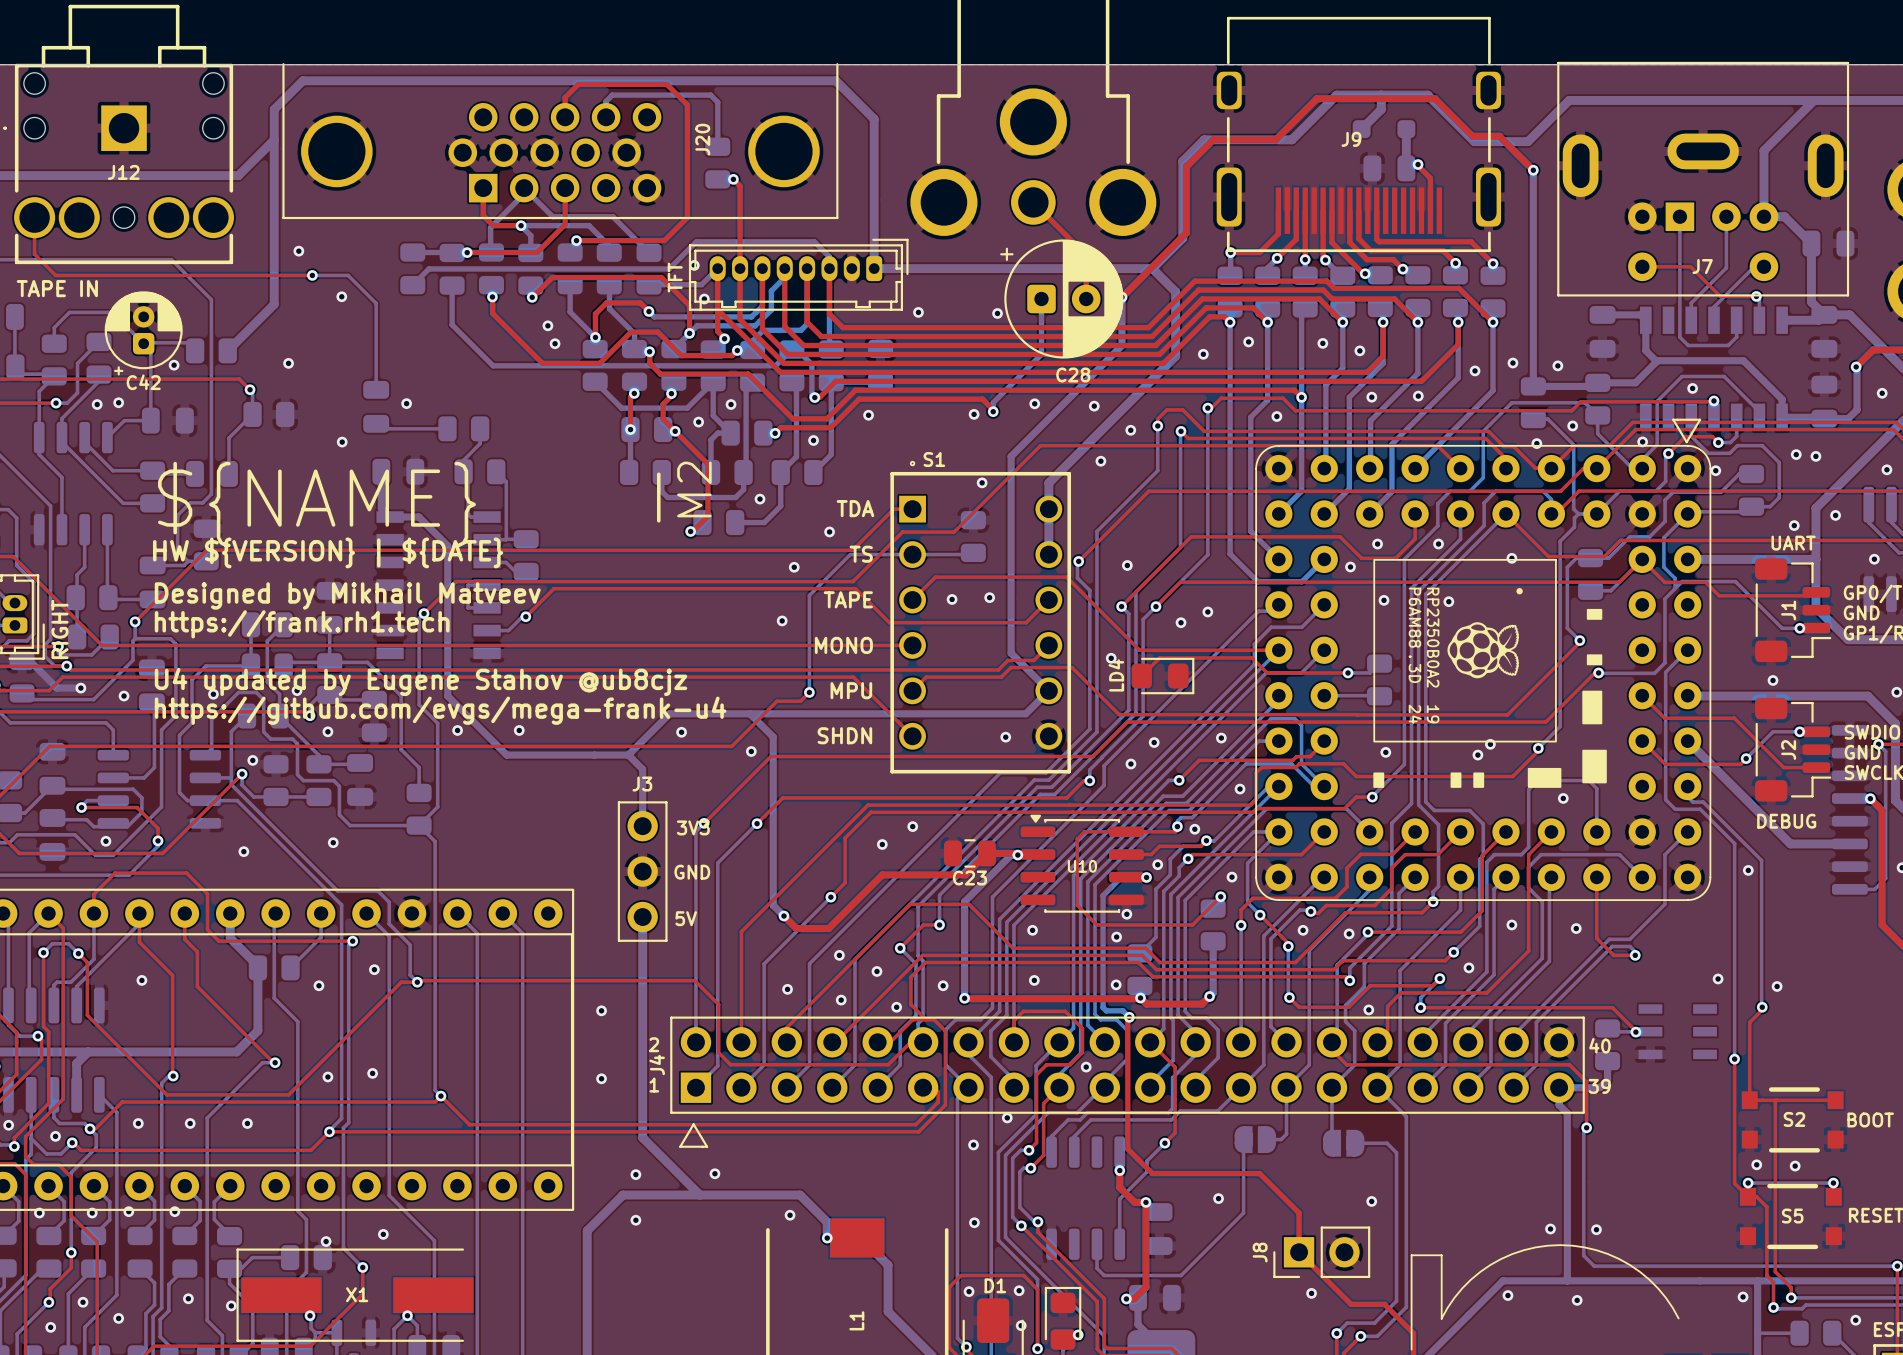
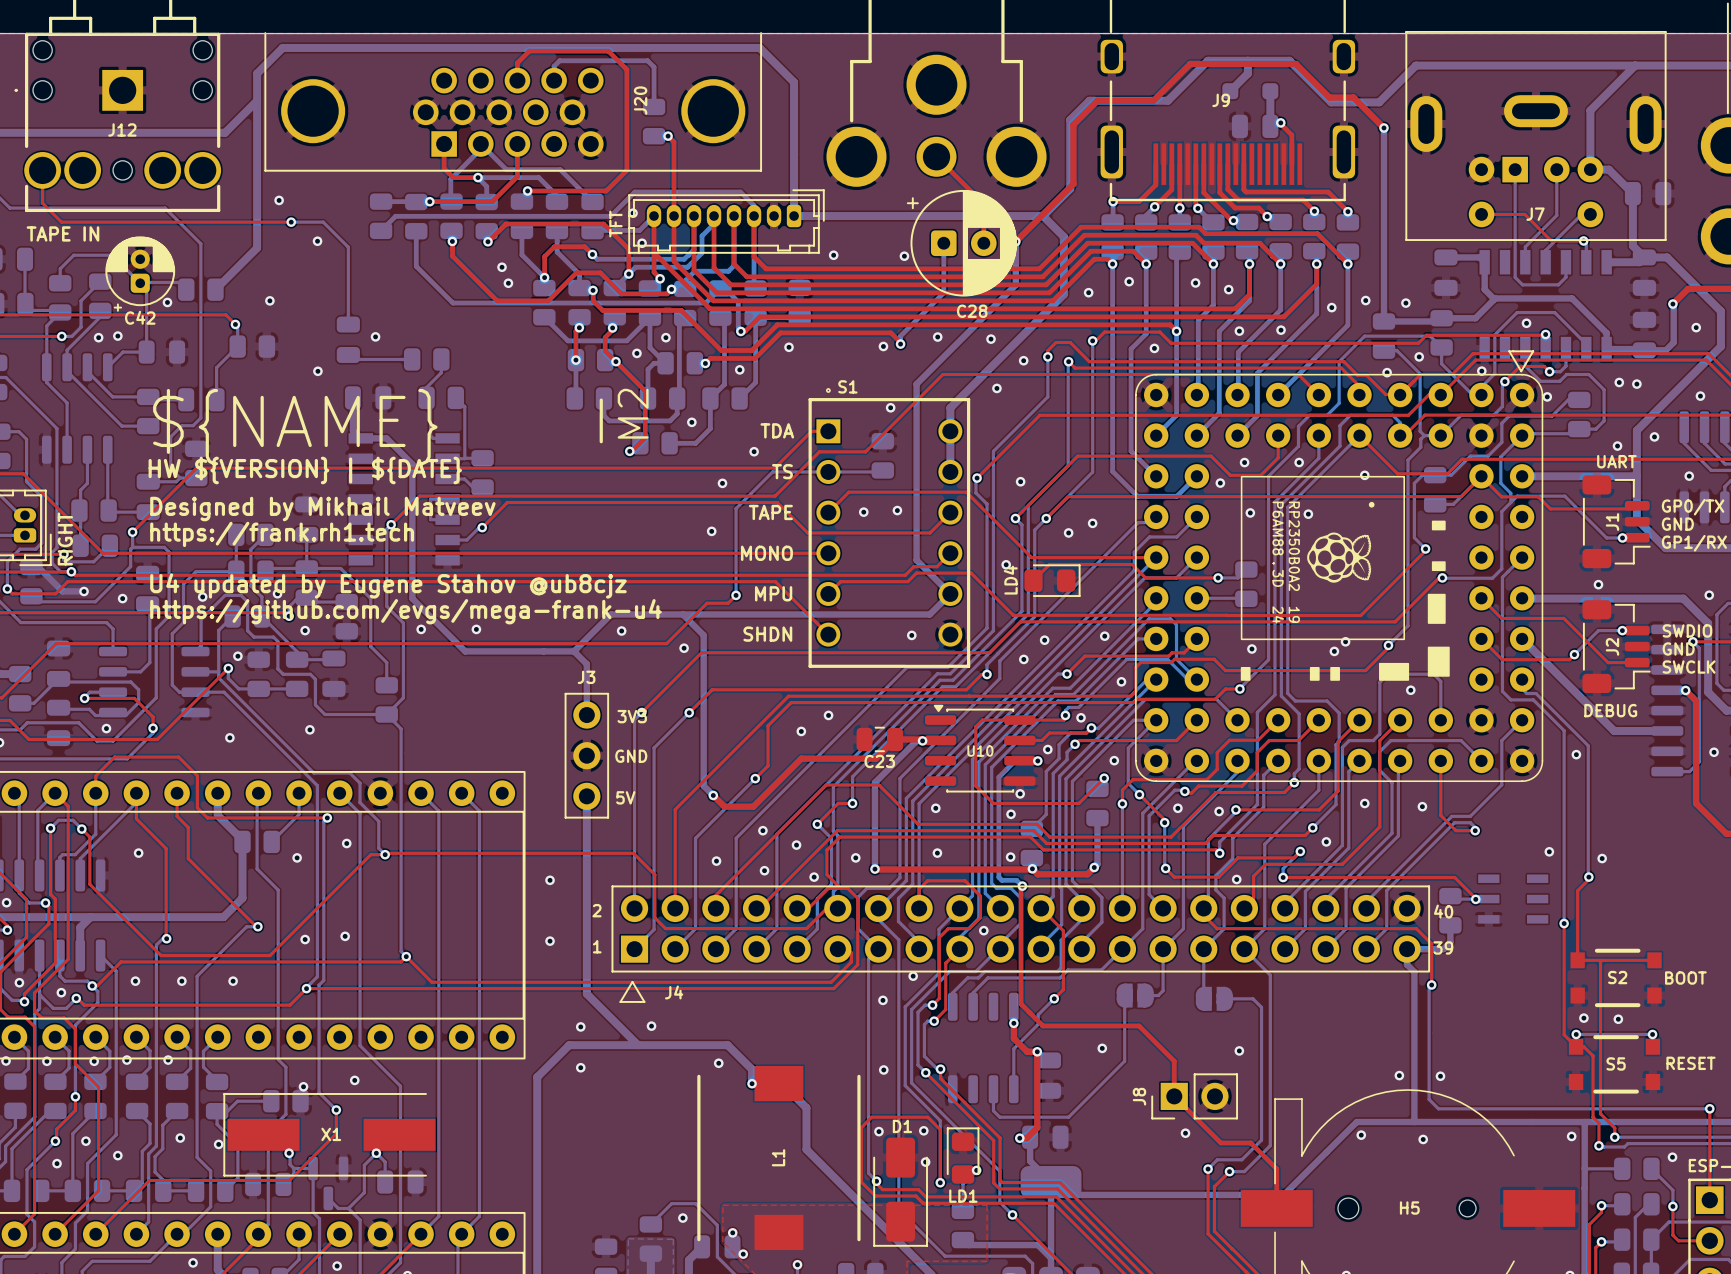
J4 name rotation: 0° (657, 1065) -> 90° clockwise (674, 992)
J4 name position: J4 (657, 1065) -> J4 (674, 992)

